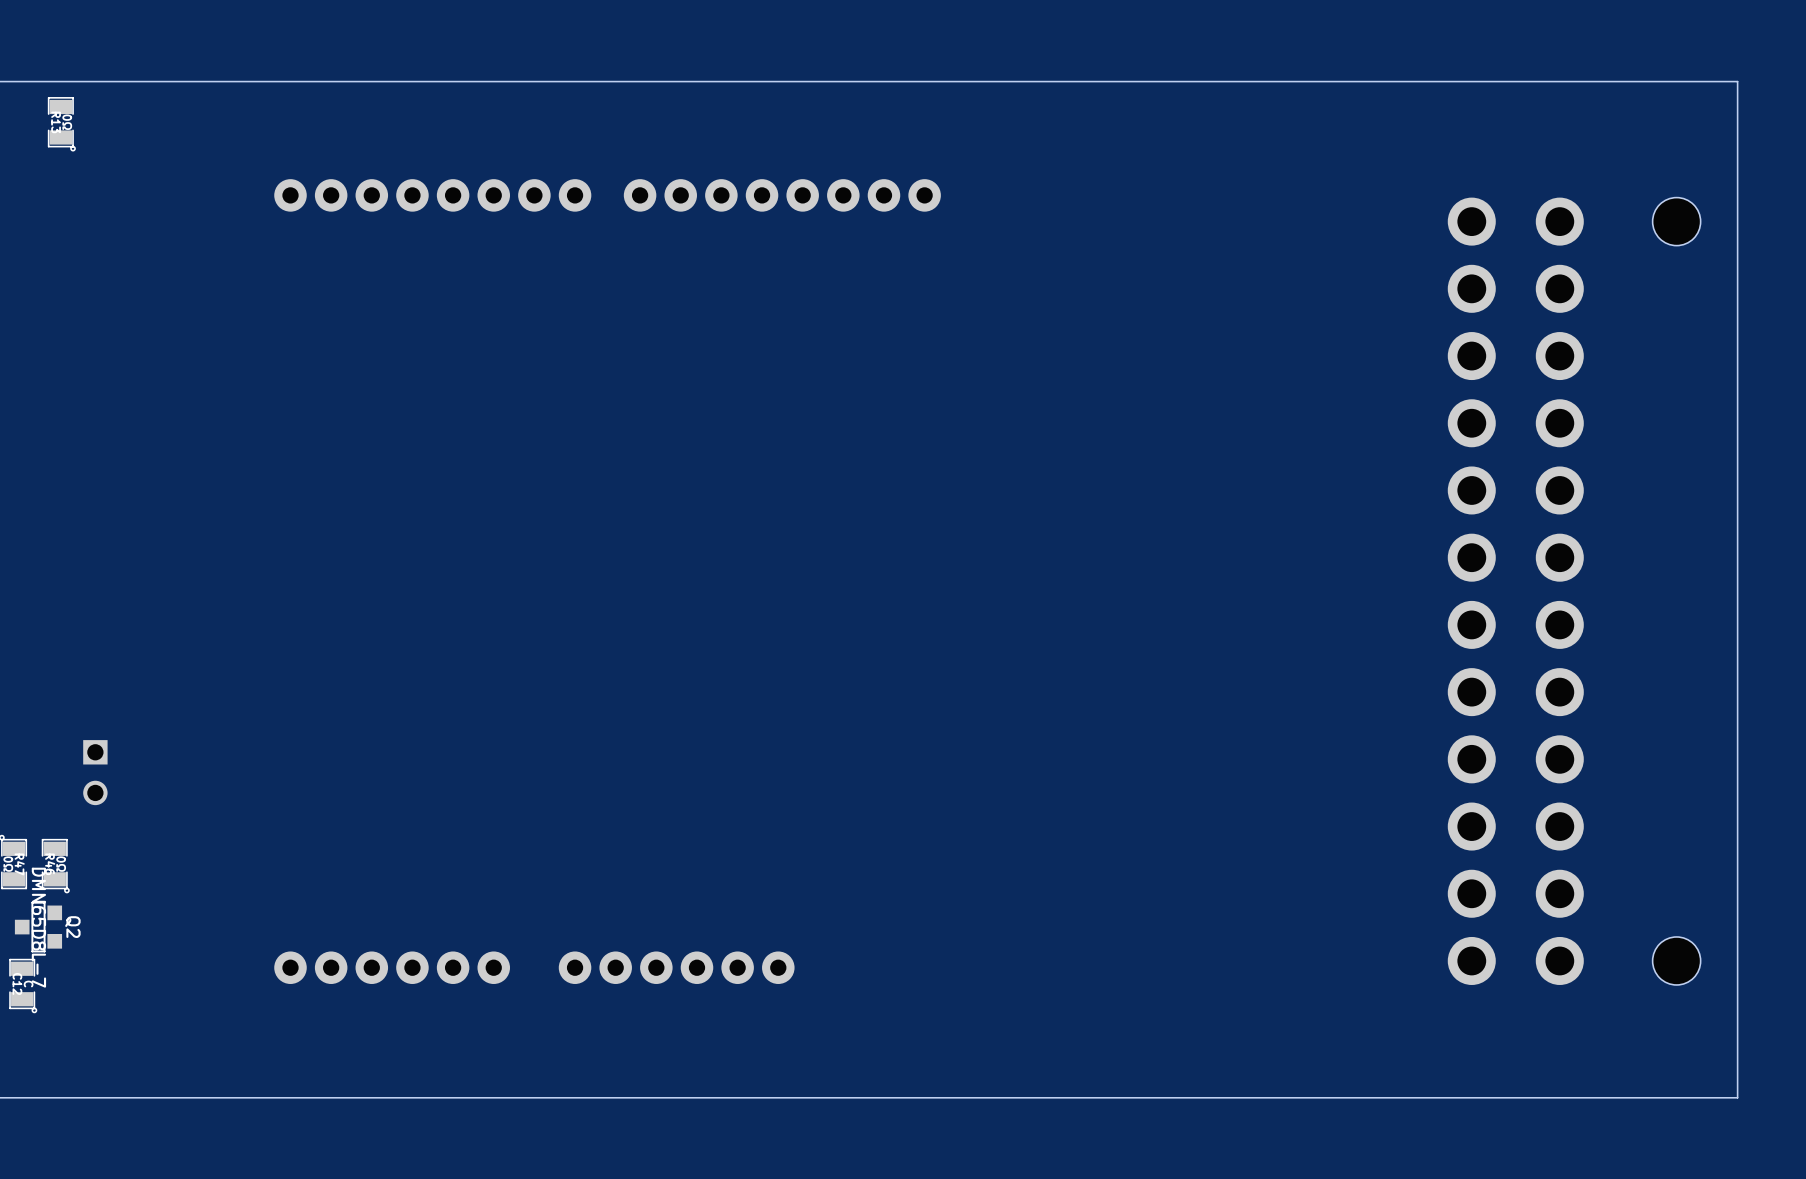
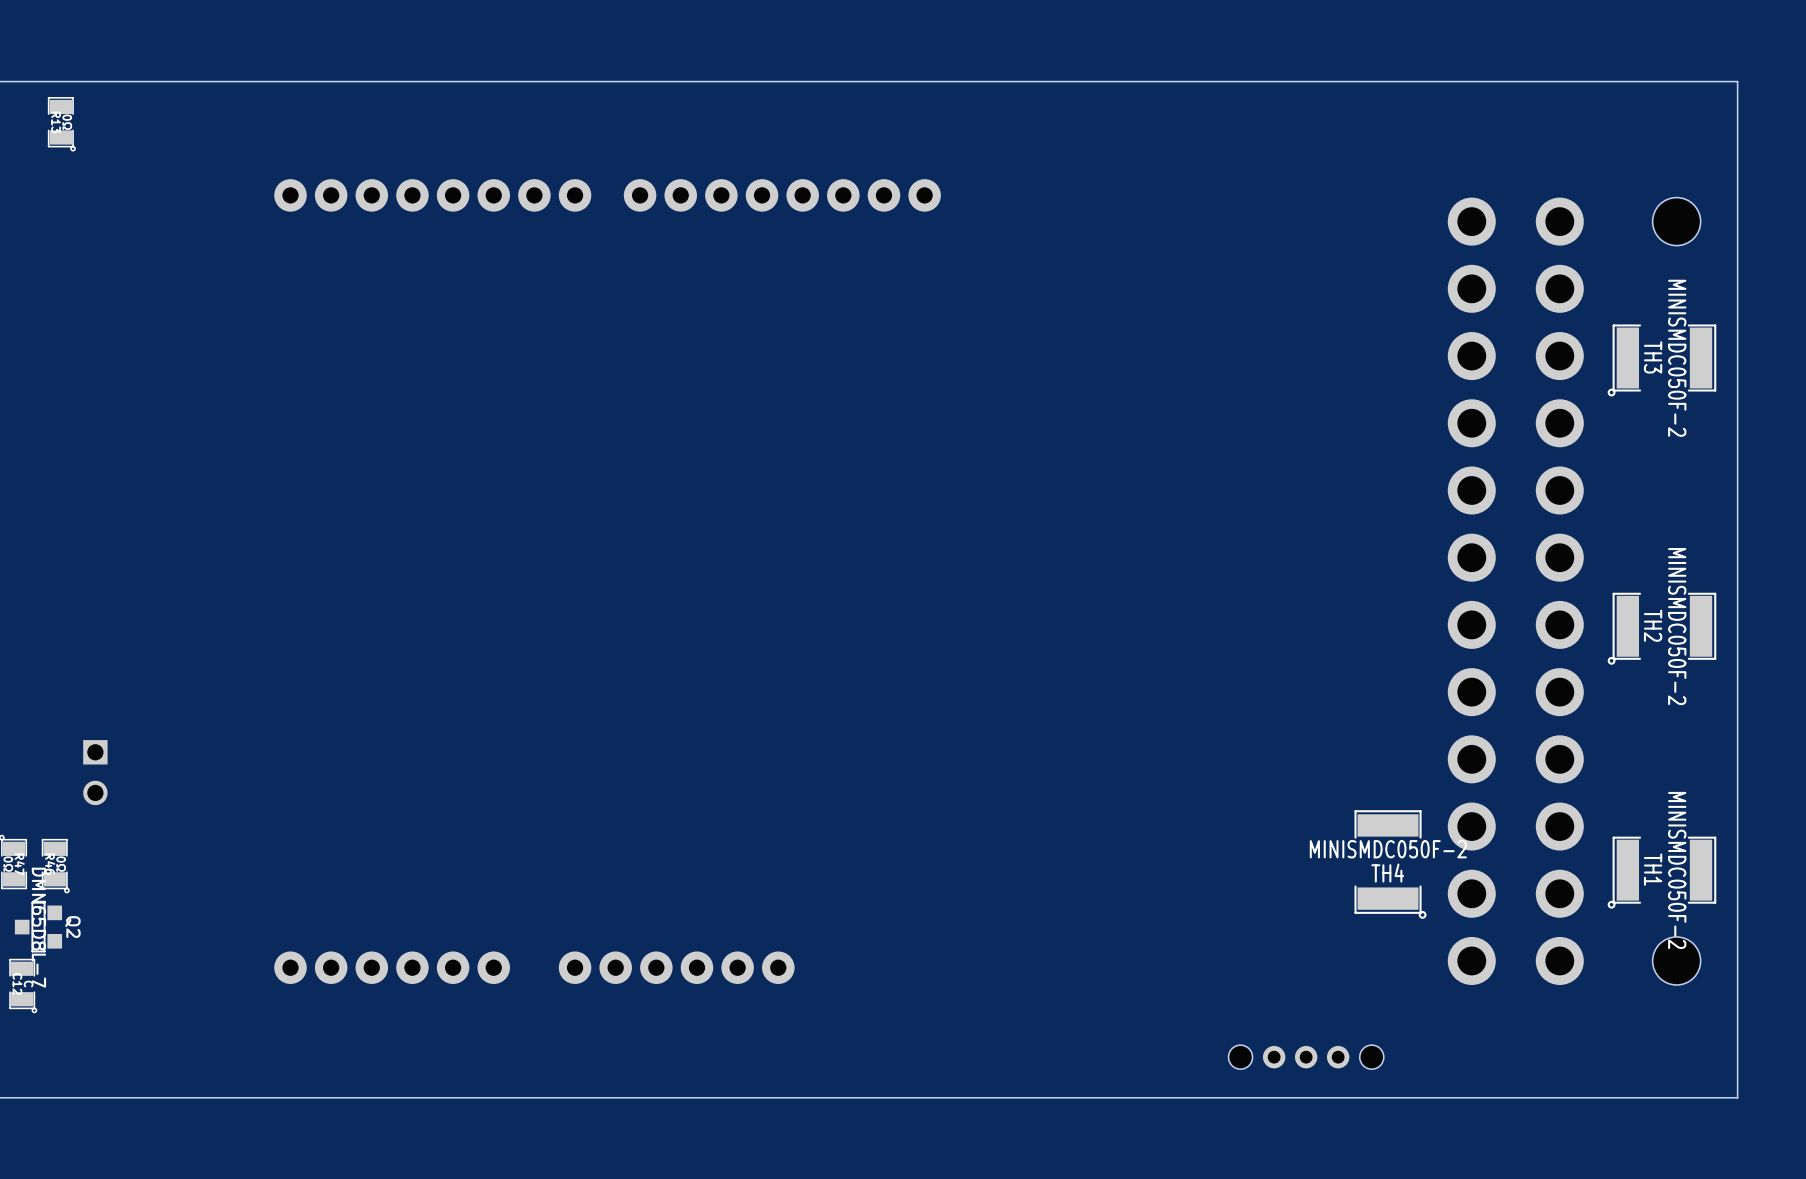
TH3: none -> MINISMDC050F-2 (1661, 360)
TH2: none -> MINISMDC050F-2 (1661, 628)
TH4: none -> MINISMDC050F-2 (1390, 864)
TH1: none -> MINISMDC050F-2 (1661, 872)
part: none -> (1306, 1057)

